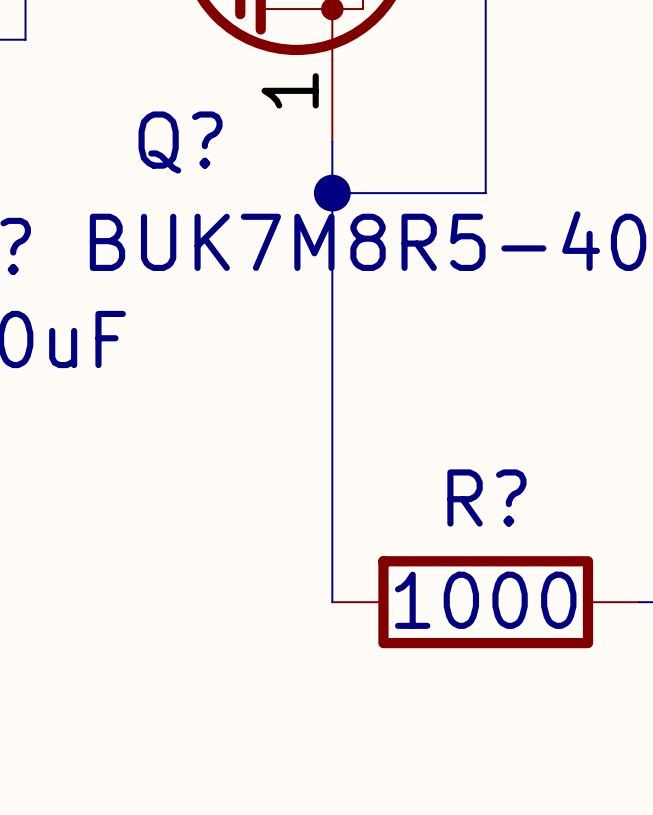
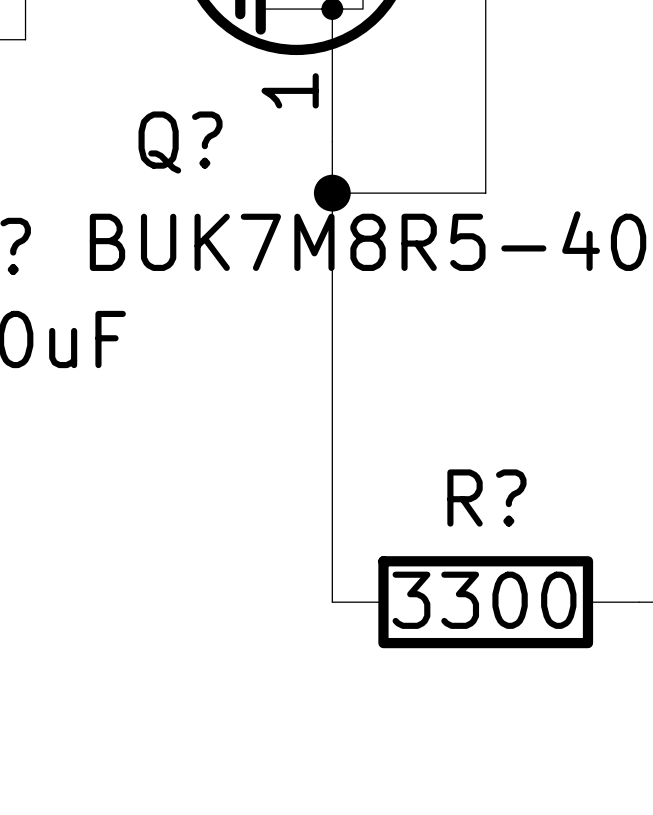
R? value: 1000 (485, 600) -> 3300 (484, 600)

